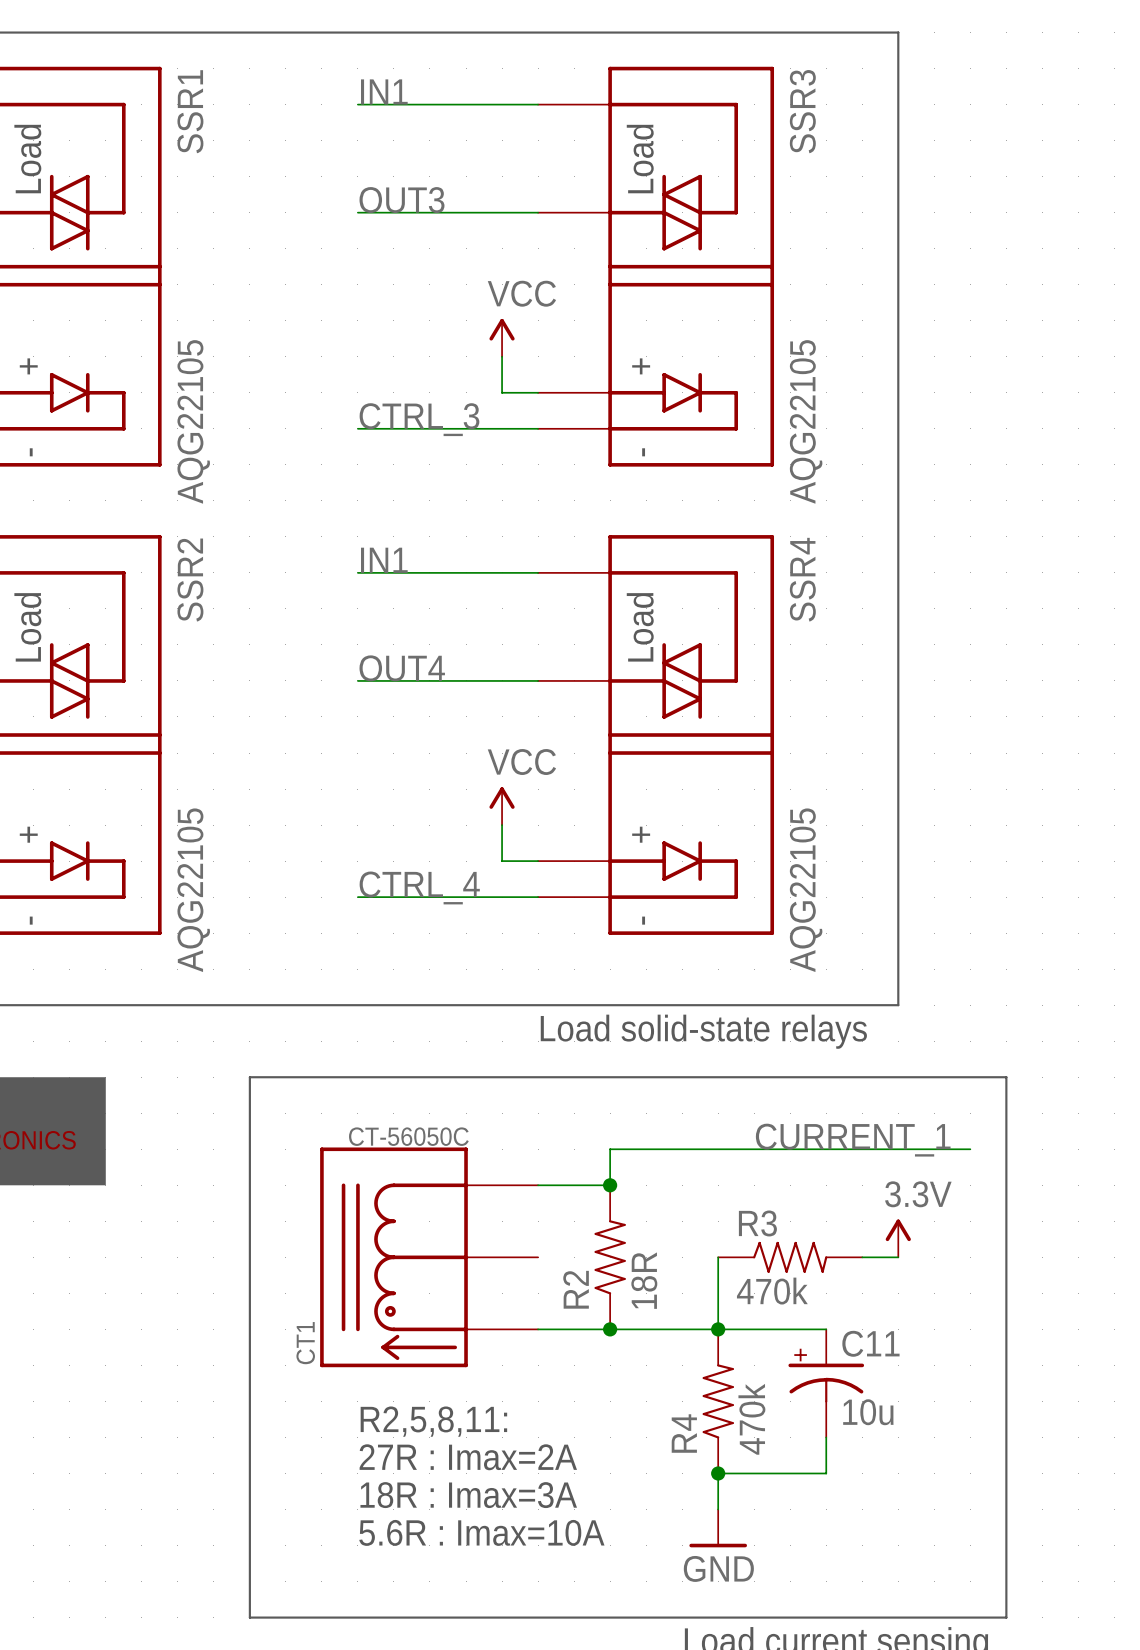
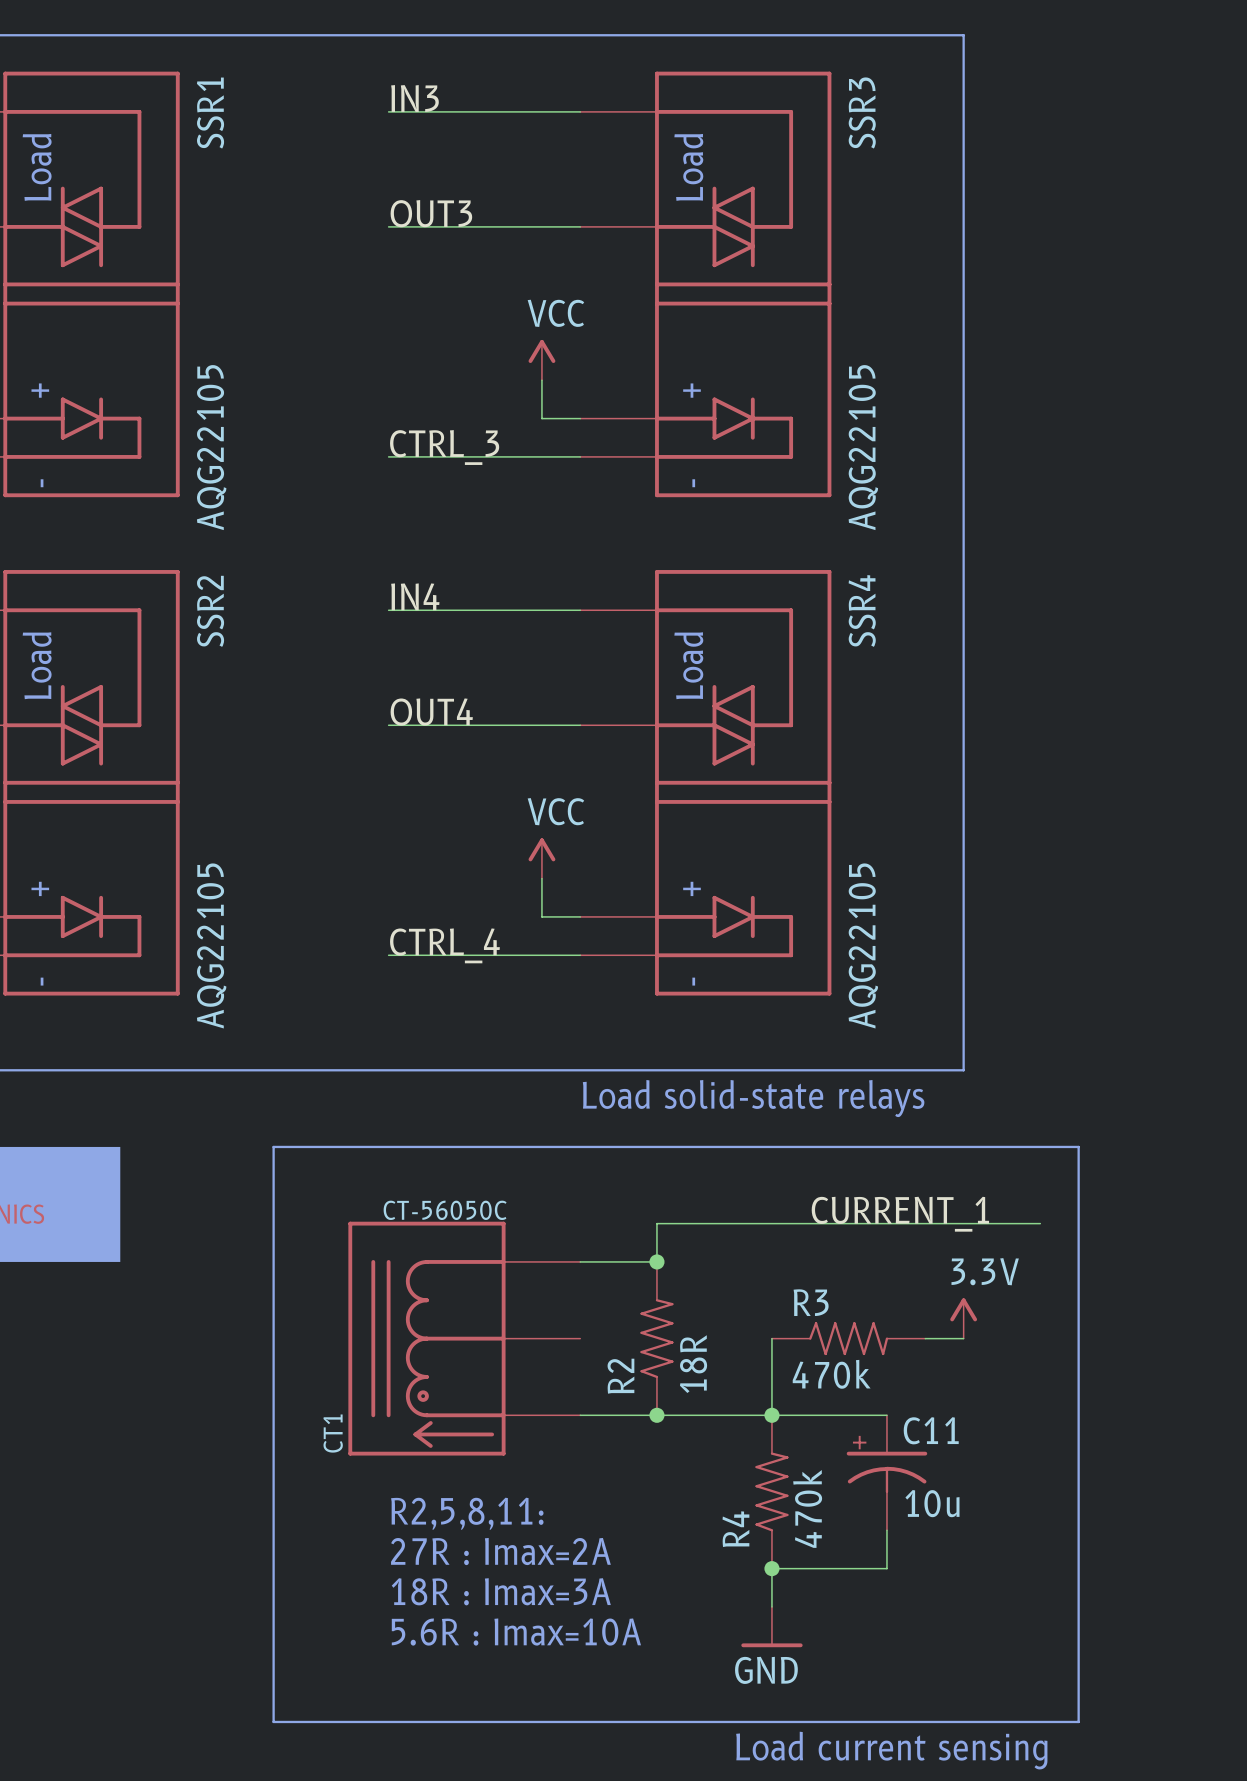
label: IN1 (384, 91) -> IN3 (414, 98)
label: IN1 (384, 560) -> IN4 (415, 596)

